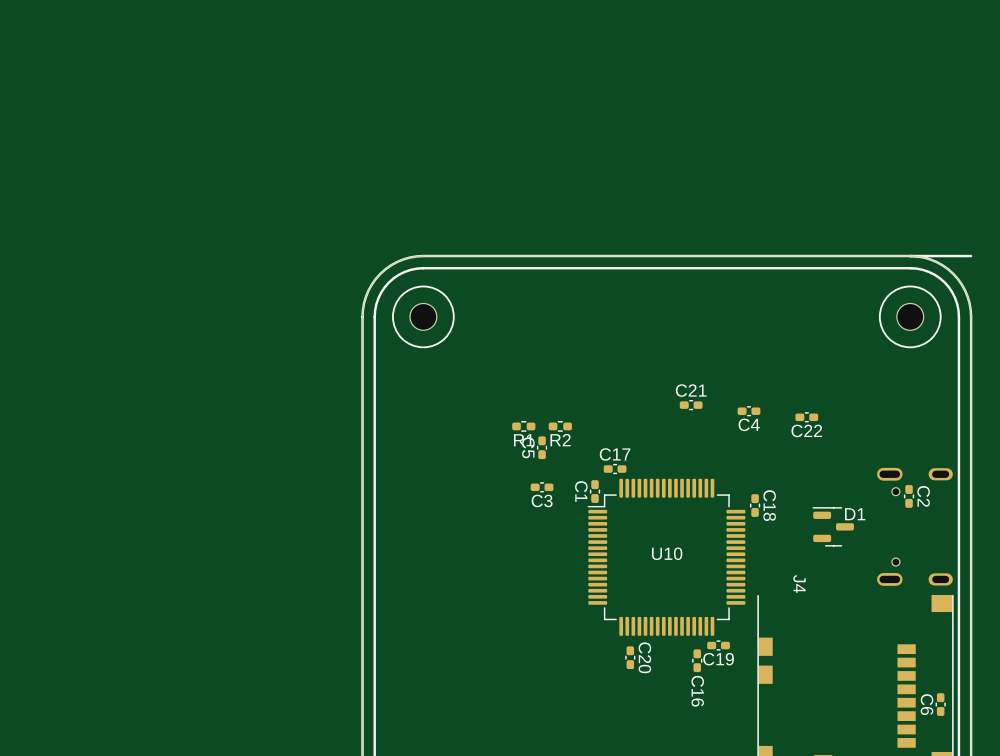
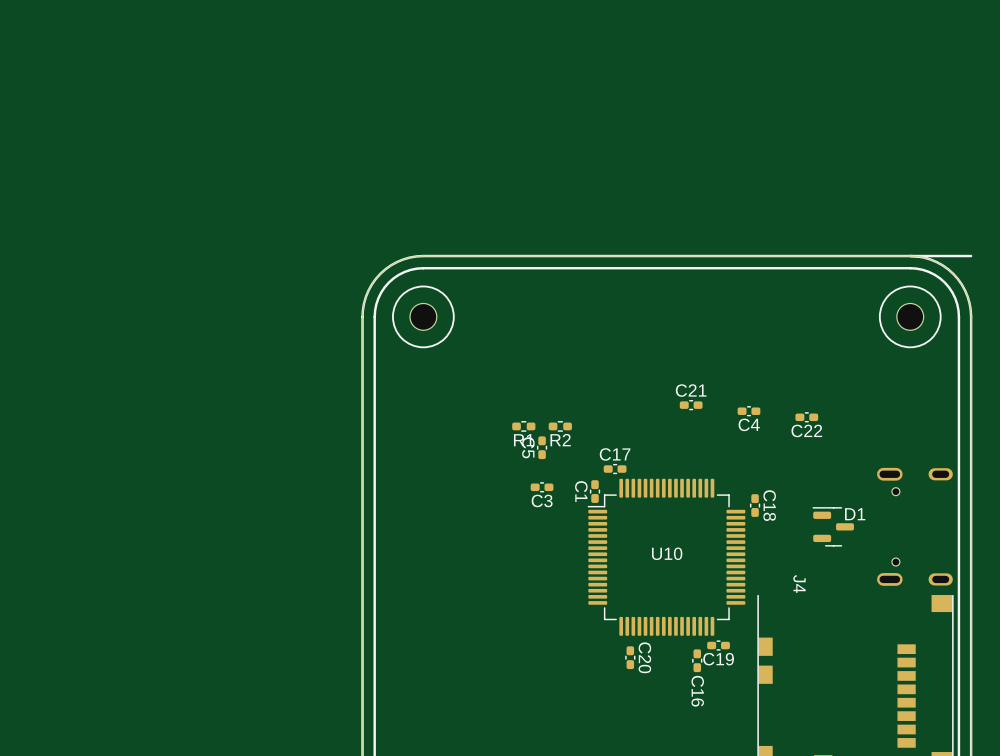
C2: (909, 496) -> none
C6: (940, 704) -> none

